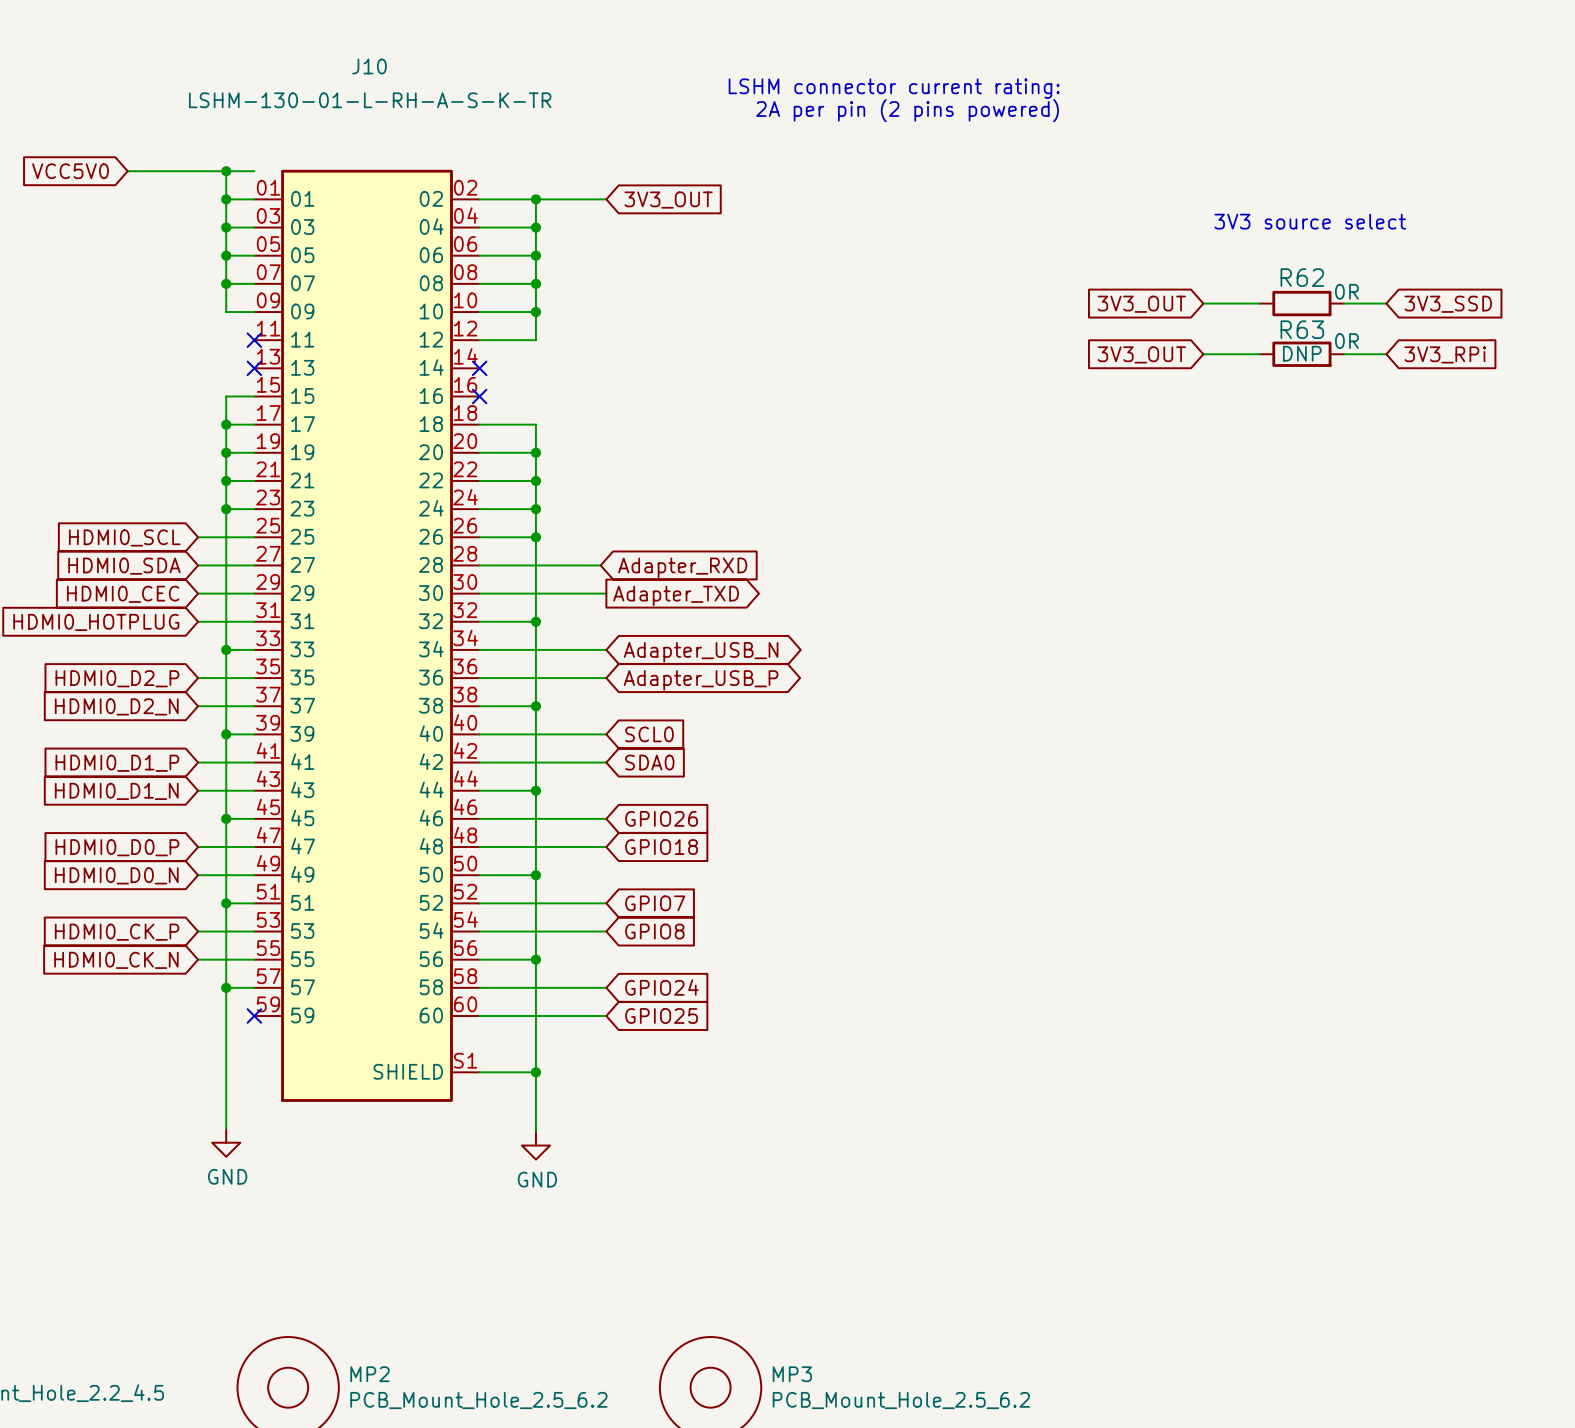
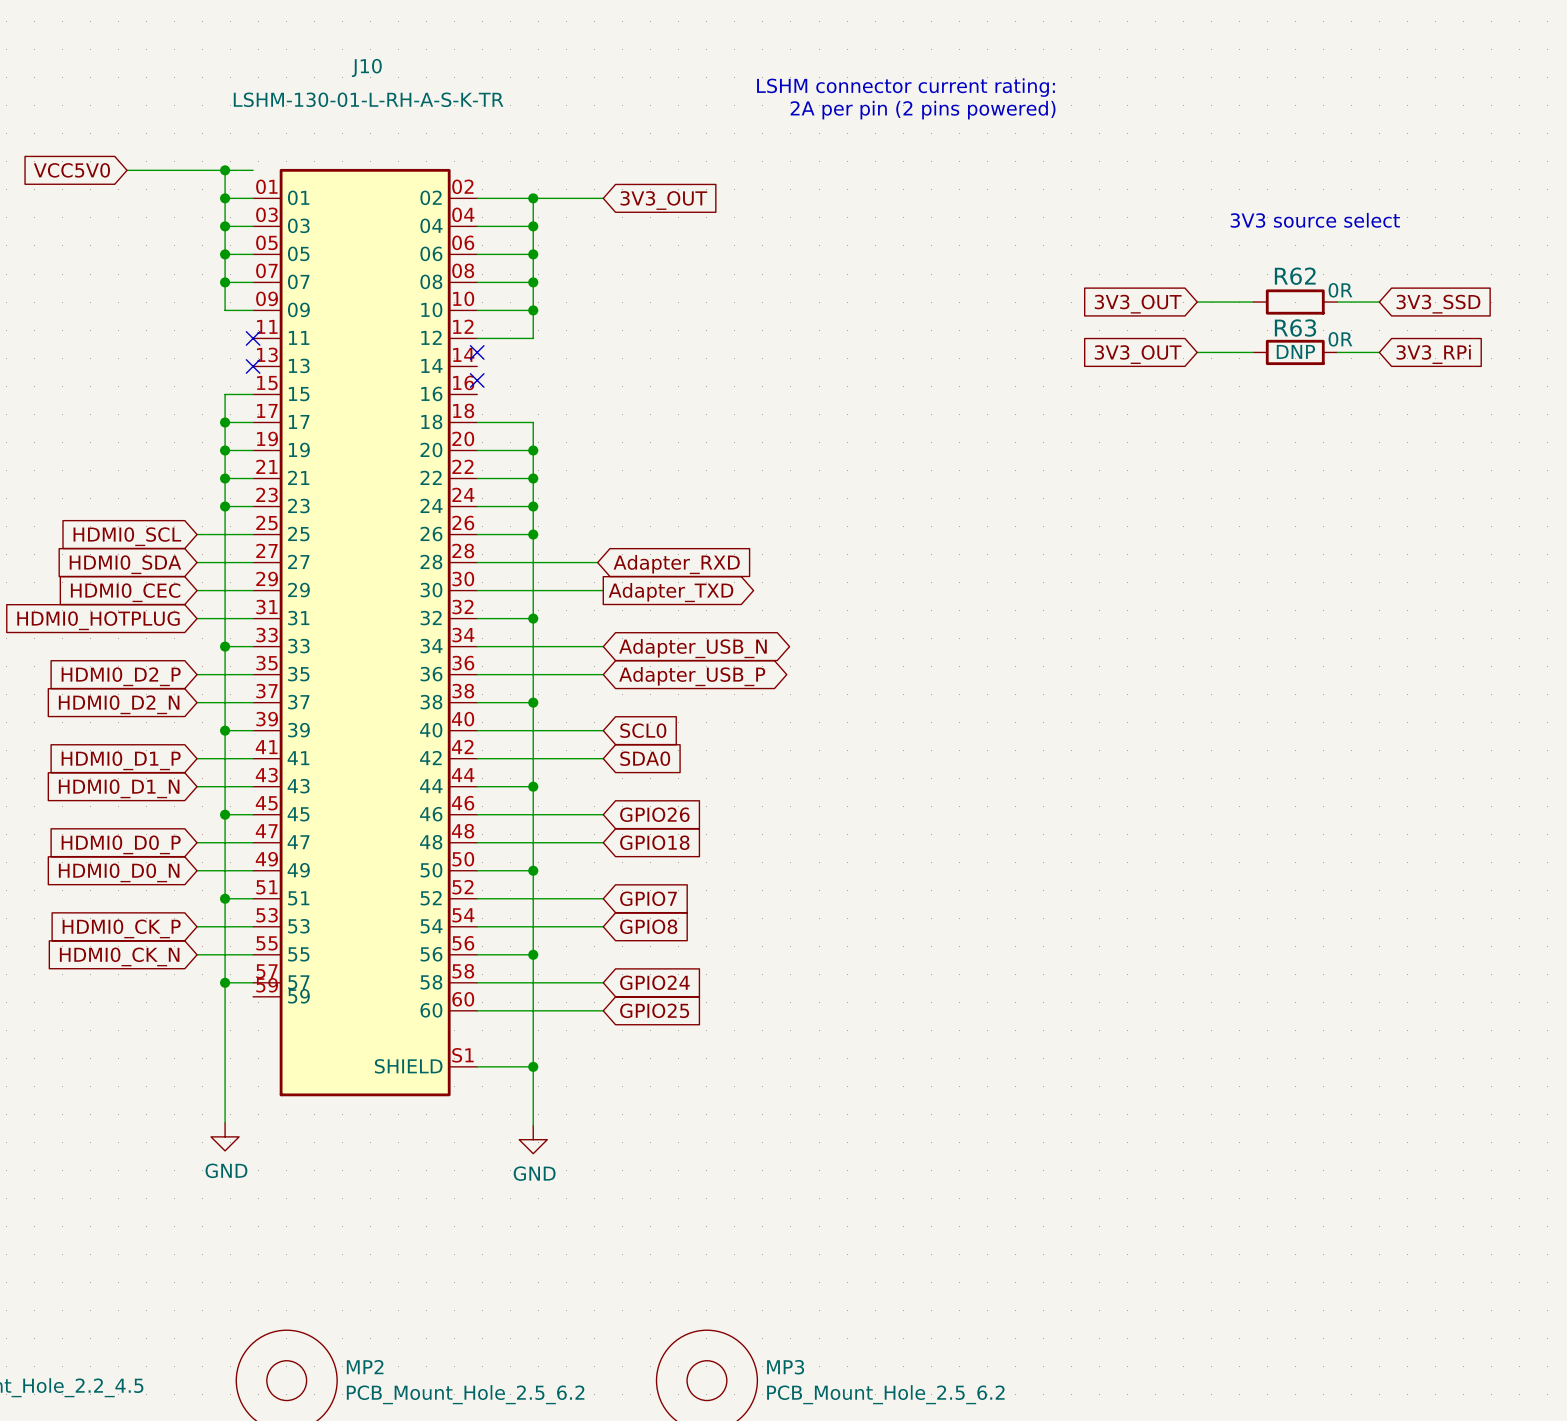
J10 symbol: [254, 169, 480, 1102] -> [253, 168, 478, 1097]
no-connect mark: none -> (477, 352)
no-connect mark: (479, 368) -> none
no-connect mark: none -> (477, 380)
no-connect mark: (479, 396) -> none
no-connect mark: (254, 1015) -> none

